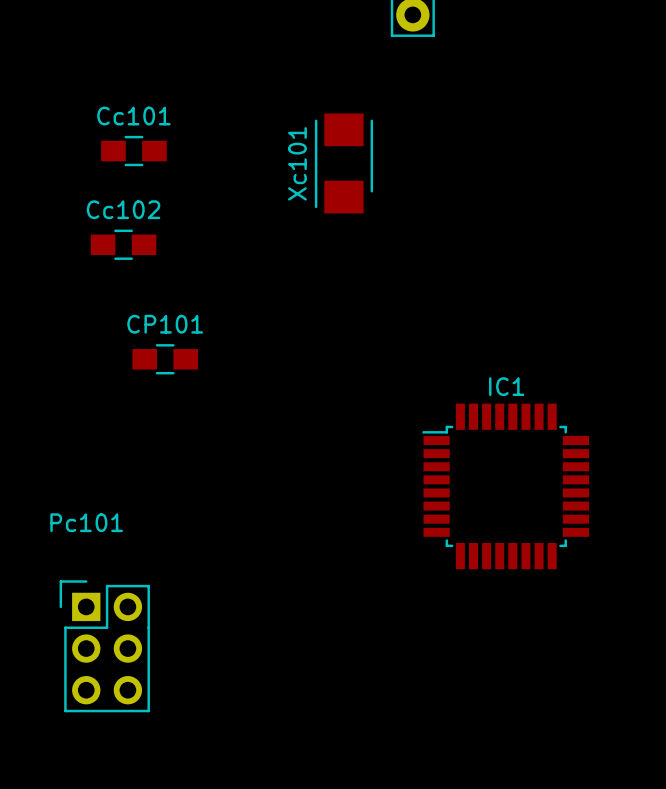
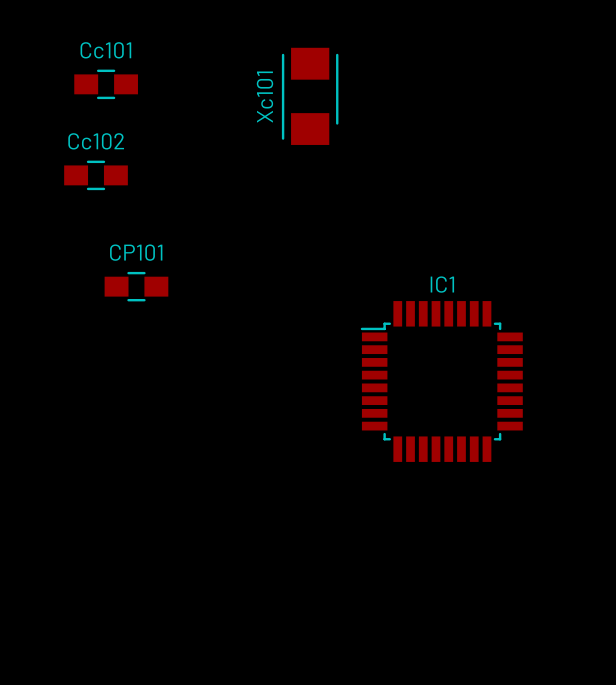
IC1 position: (505, 486) -> (441, 381)
Pc101: (104, 646) -> none

